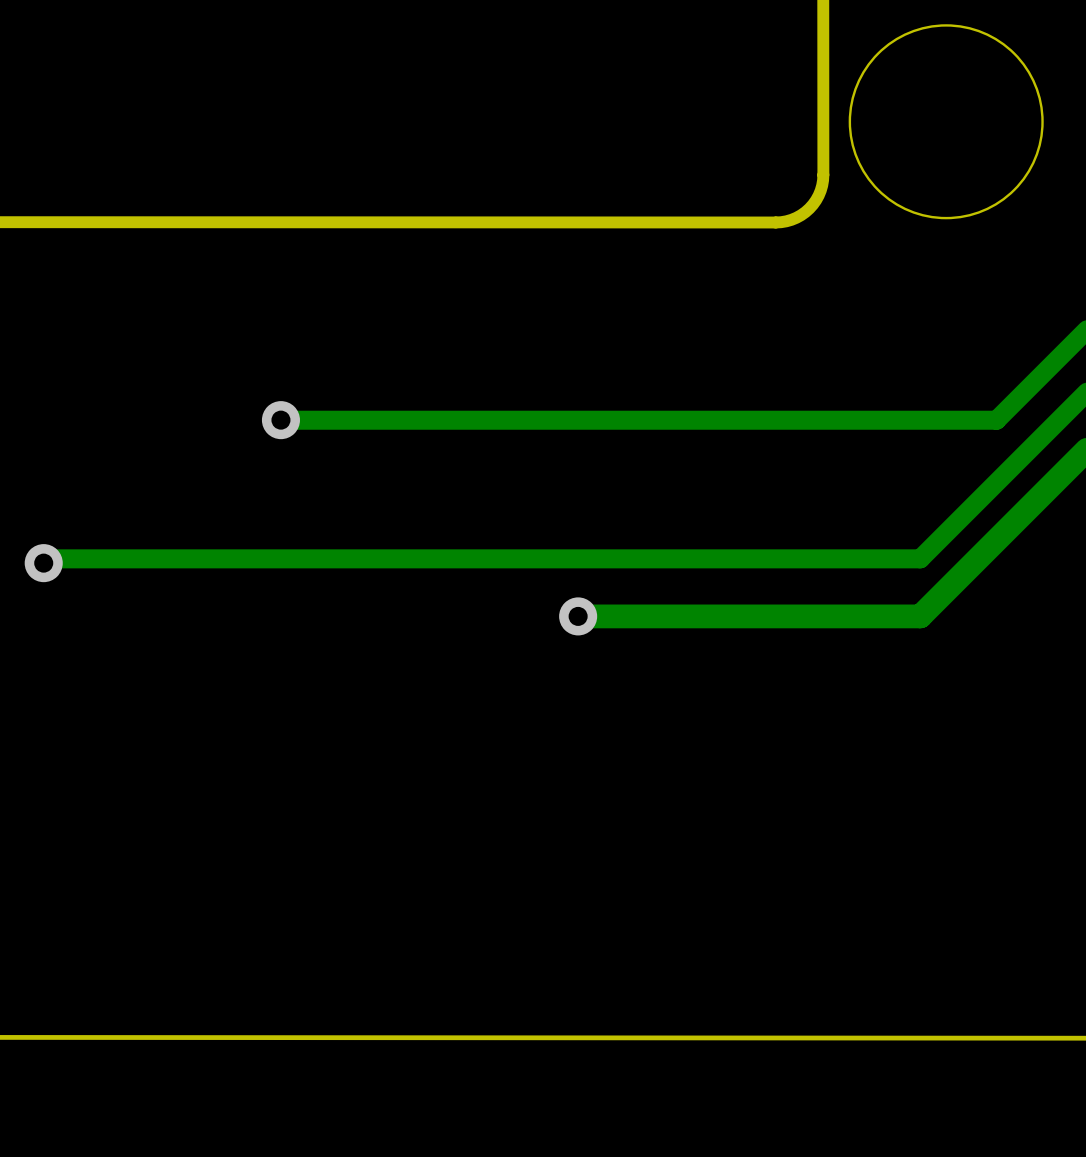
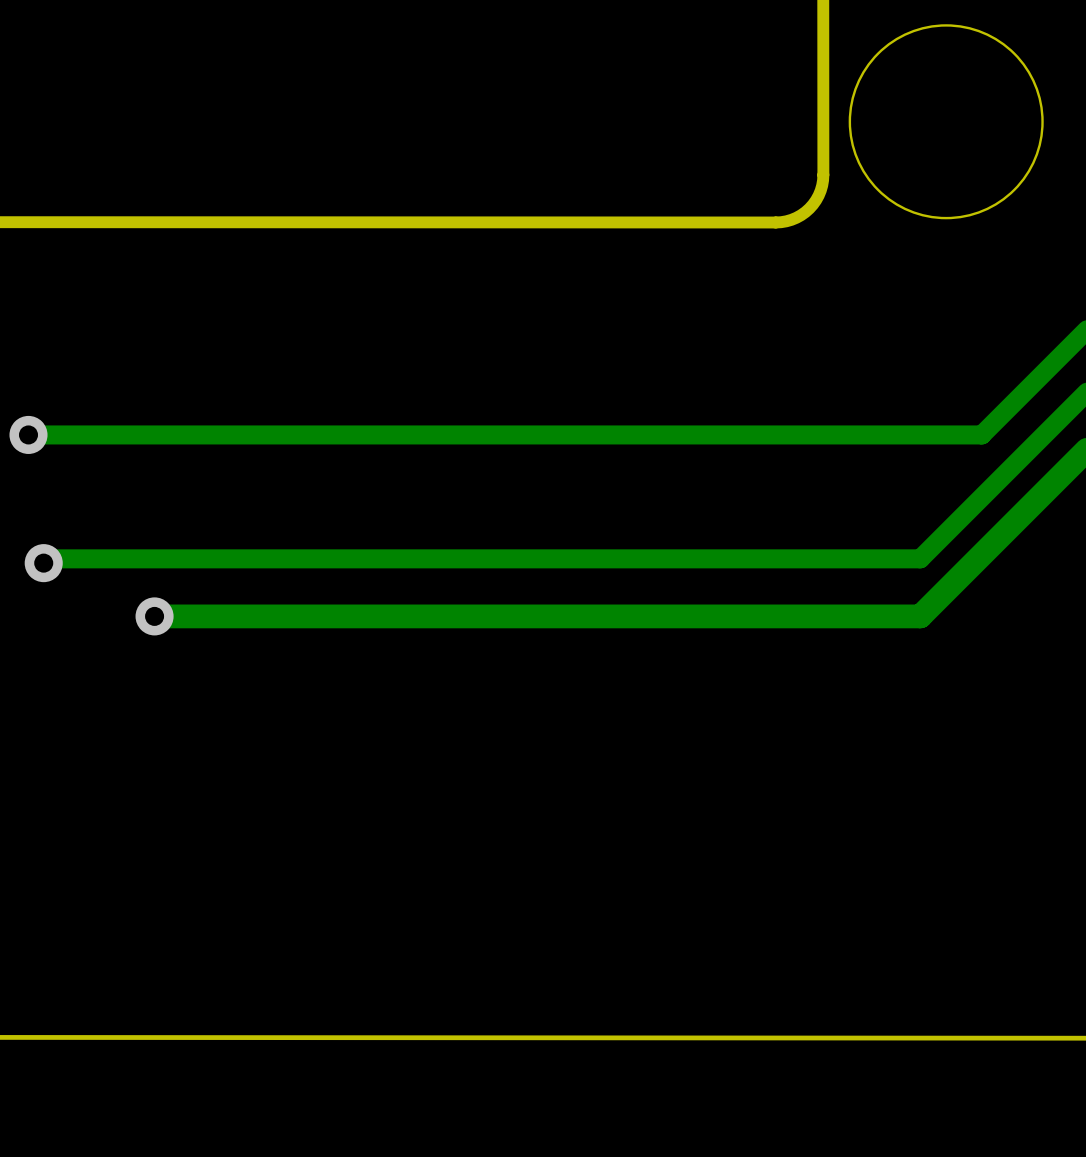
via: (280, 420) -> none
track: (996, 420) (281, 420) -> (996, 420) (981, 434) (28, 434)
via: none -> (28, 434)
via: none -> (154, 616)
track: none -> (578, 616) (154, 616)
via: (578, 616) -> none

